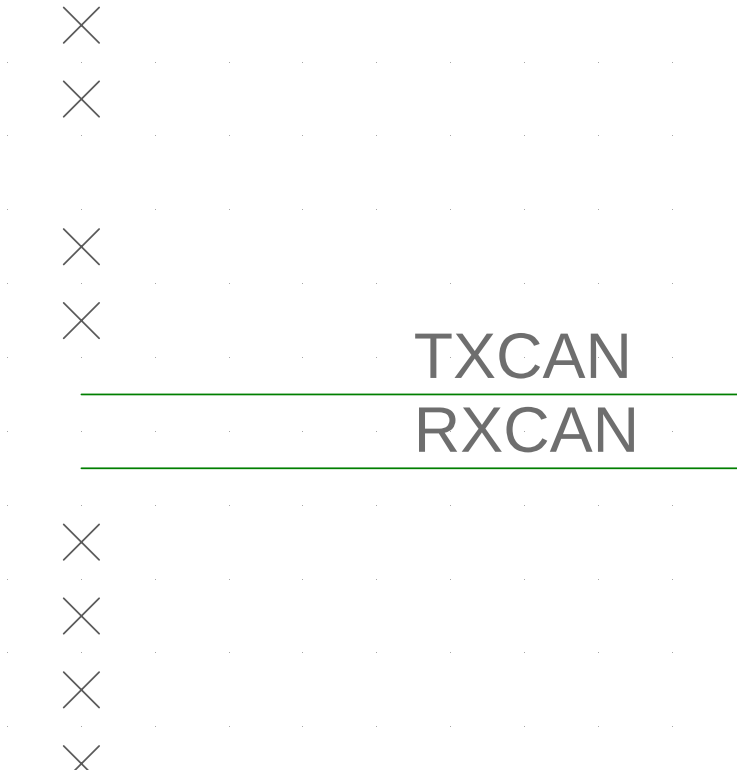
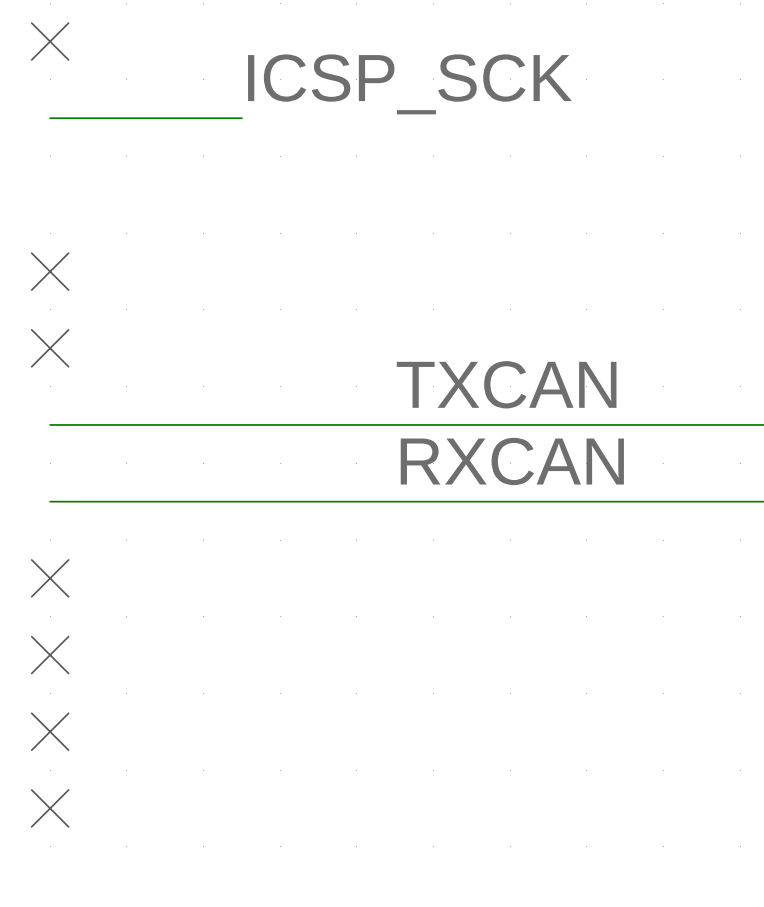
label: none -> ICSP_SCK (409, 84)
wire: none -> (50, 118) (241, 118)
no-connect mark: (81, 99) -> none

